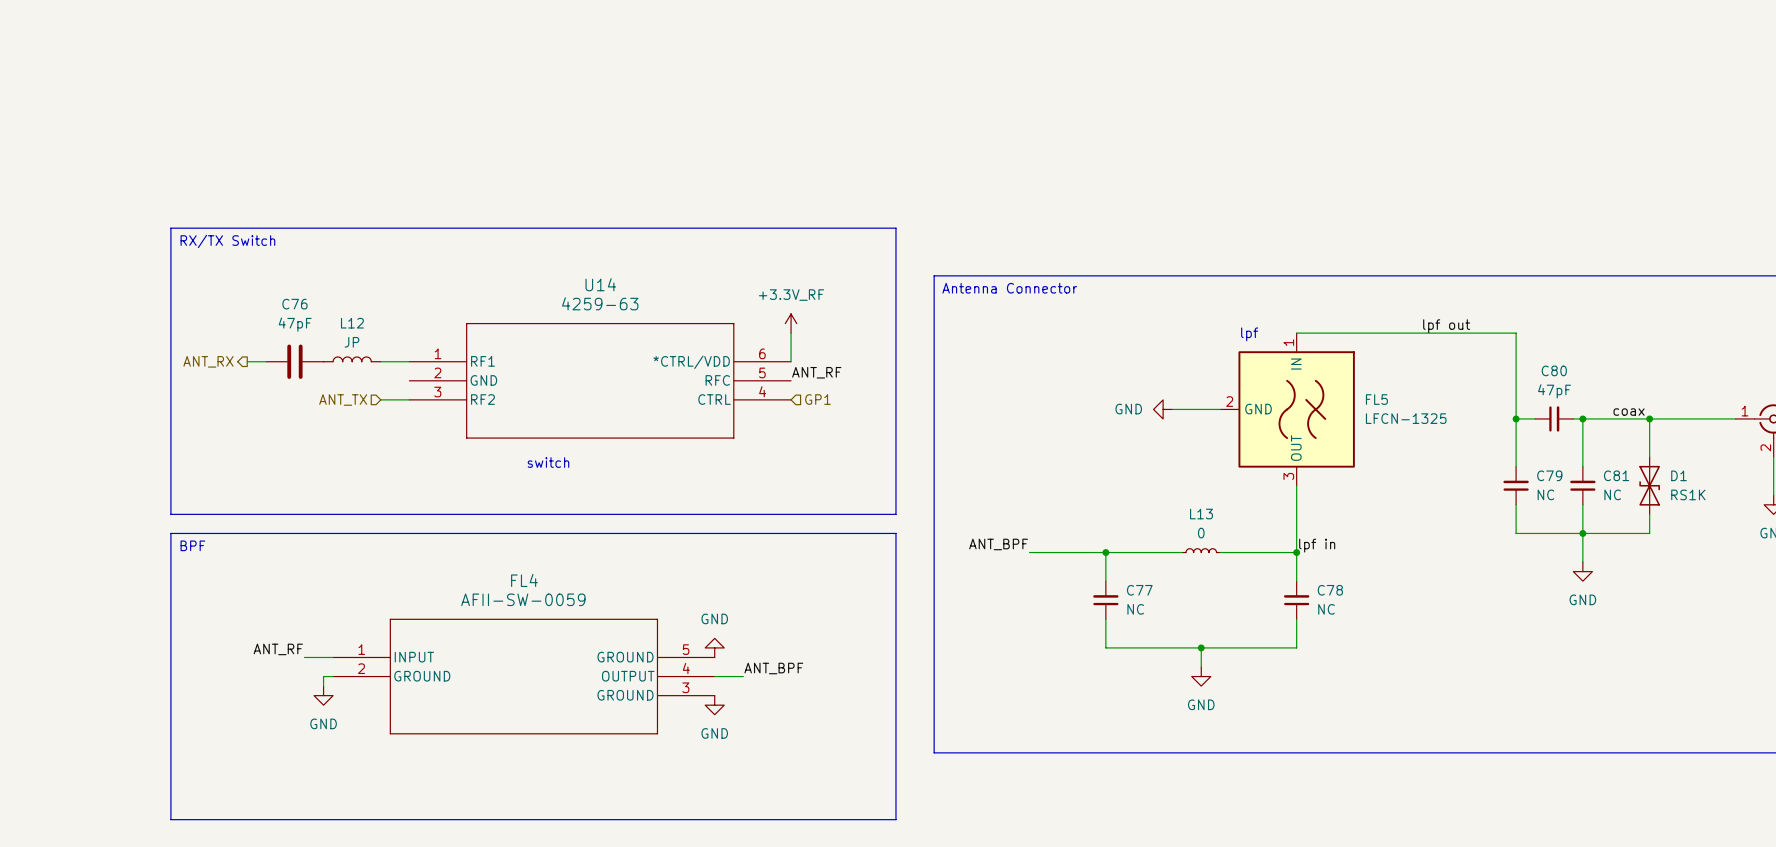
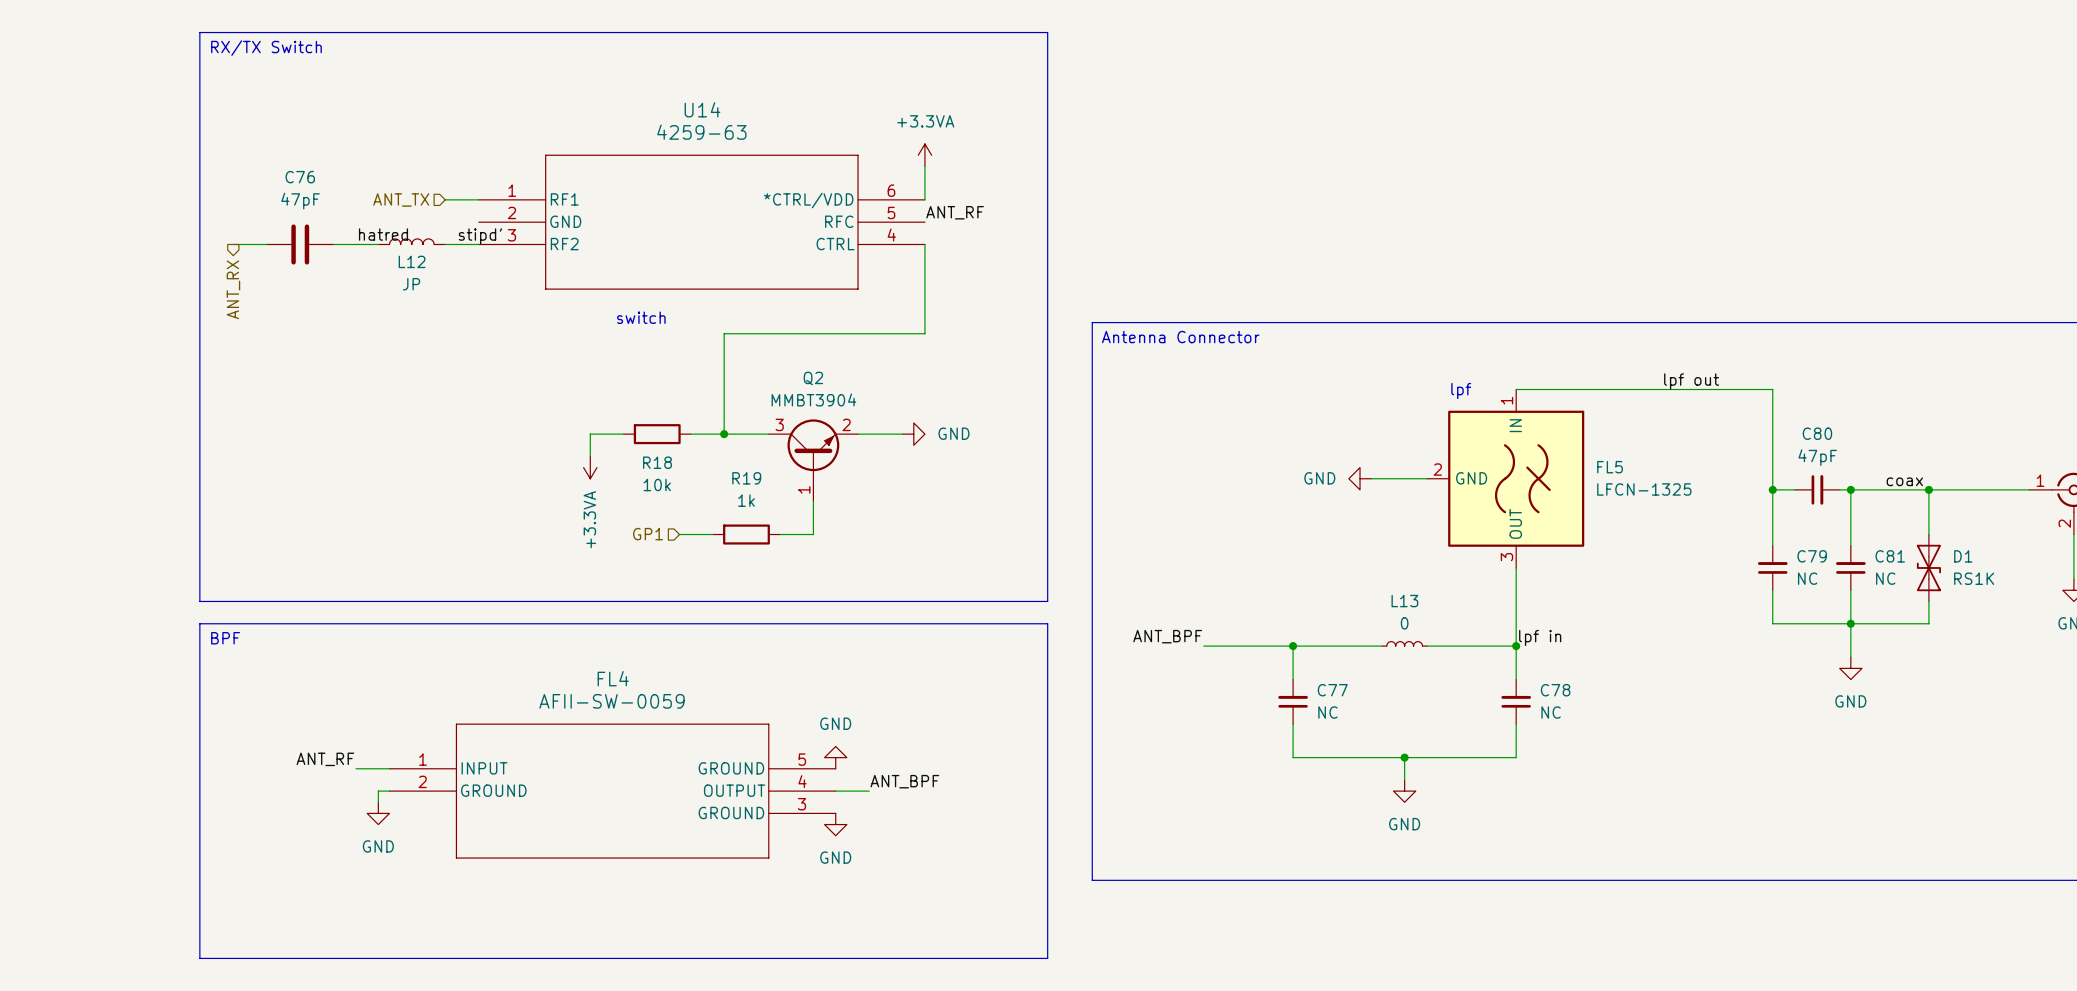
text: none -> RX/TX Switch (266, 48)
power symbol: none -> +3.3VA (924, 155)
wire: none -> (924, 166) (924, 199)
wire: none -> (445, 199) (478, 199)
hierarchical label: none -> ANT_TX (401, 199)
label: none -> ANT_RF (955, 212)
label: none -> hatred (383, 234)
label: none -> stipd' (480, 236)
wire: none -> (233, 244) (266, 244)
wire: none -> (333, 244) (378, 244)
wire: none -> (924, 244) (924, 333) (724, 333) (724, 434)
line: (170, 228) (895, 228) -> (199, 266) (199, 32) (1047, 32) (1047, 266)
text: RX/TX Switch (227, 241) -> none
text: none -> switch (641, 317)
L12 name position: L12 (352, 323) -> L12 (412, 261)
power symbol: +3.3V_RF (791, 323) -> none
wire: (791, 333) (791, 361) -> none
L12 value position: JP (351, 342) -> JP (411, 284)
L12 position: (352, 359) -> (411, 241)
hierarchical label rotation: 0° (208, 361) -> 90° counterclockwise (233, 289)
hierarchical label position: ANT_RX (208, 361) -> ANT_RX (233, 289)
wire: (247, 361) (266, 361) -> none
C76 position: (294, 361) -> (300, 244)
wire: (380, 361) (409, 361) -> (445, 244) (478, 244)
wire: none -> (623, 434) (590, 434) (590, 456)
R18: none -> 10k (657, 434)
wire: none -> (690, 434) (768, 434)
junction: none -> (724, 434)
wire: none -> (858, 434) (902, 434)
power symbol: none -> GND (913, 434)
label: ANT_RF (816, 372) -> none
U14 position: (600, 380) -> (701, 222)
Q2: none -> MMBT3904 (813, 460)
hierarchical label: ANT_TX (343, 399) -> none
wire: (380, 399) (409, 399) -> none
power symbol: none -> +3.3VA (590, 467)
hierarchical label: GP1 (817, 399) -> none
wire: none -> (813, 501) (813, 534) (779, 534)
hierarchical label: none -> GP1 (648, 534)
wire: none -> (679, 534) (713, 534)
R19: none -> 1k (746, 534)
text: switch (548, 462) -> none

